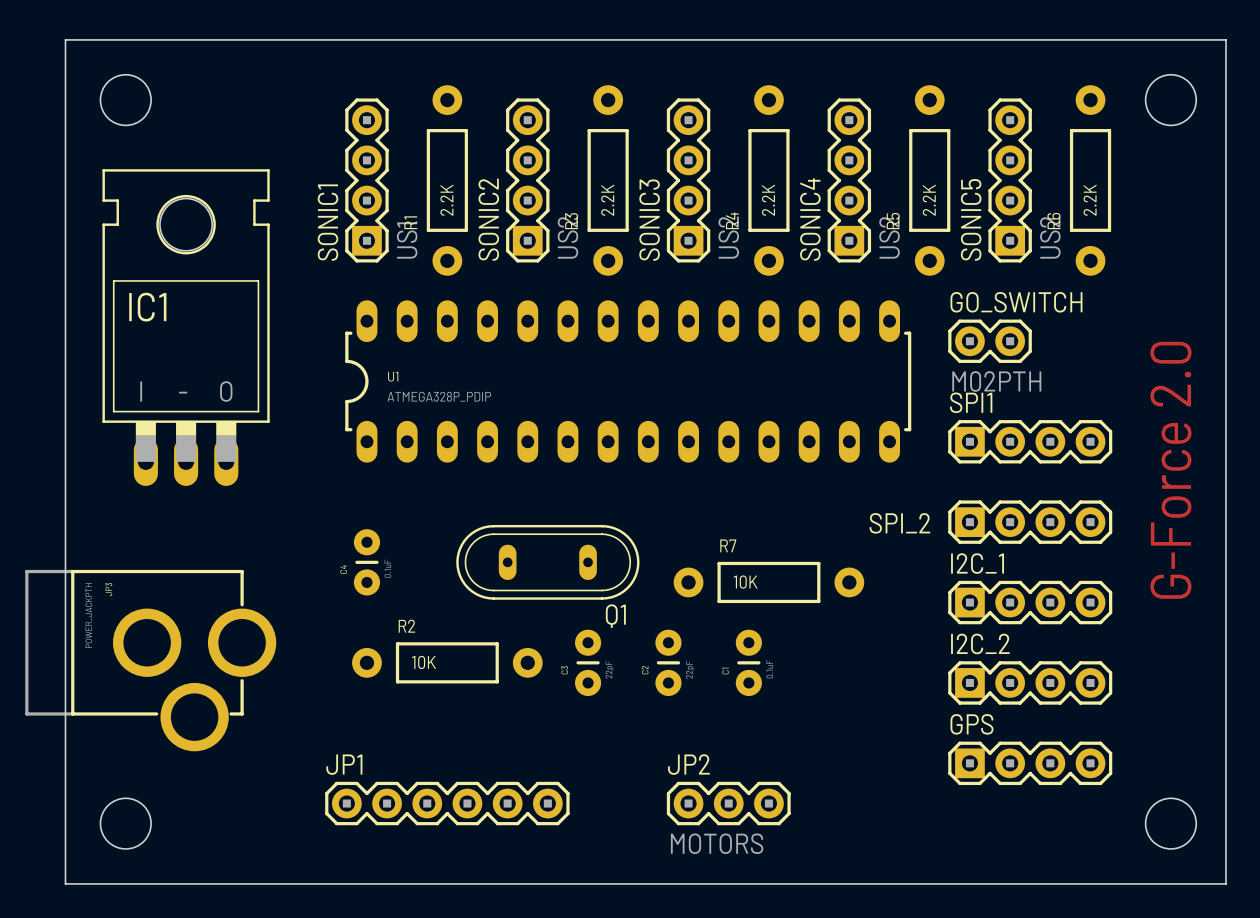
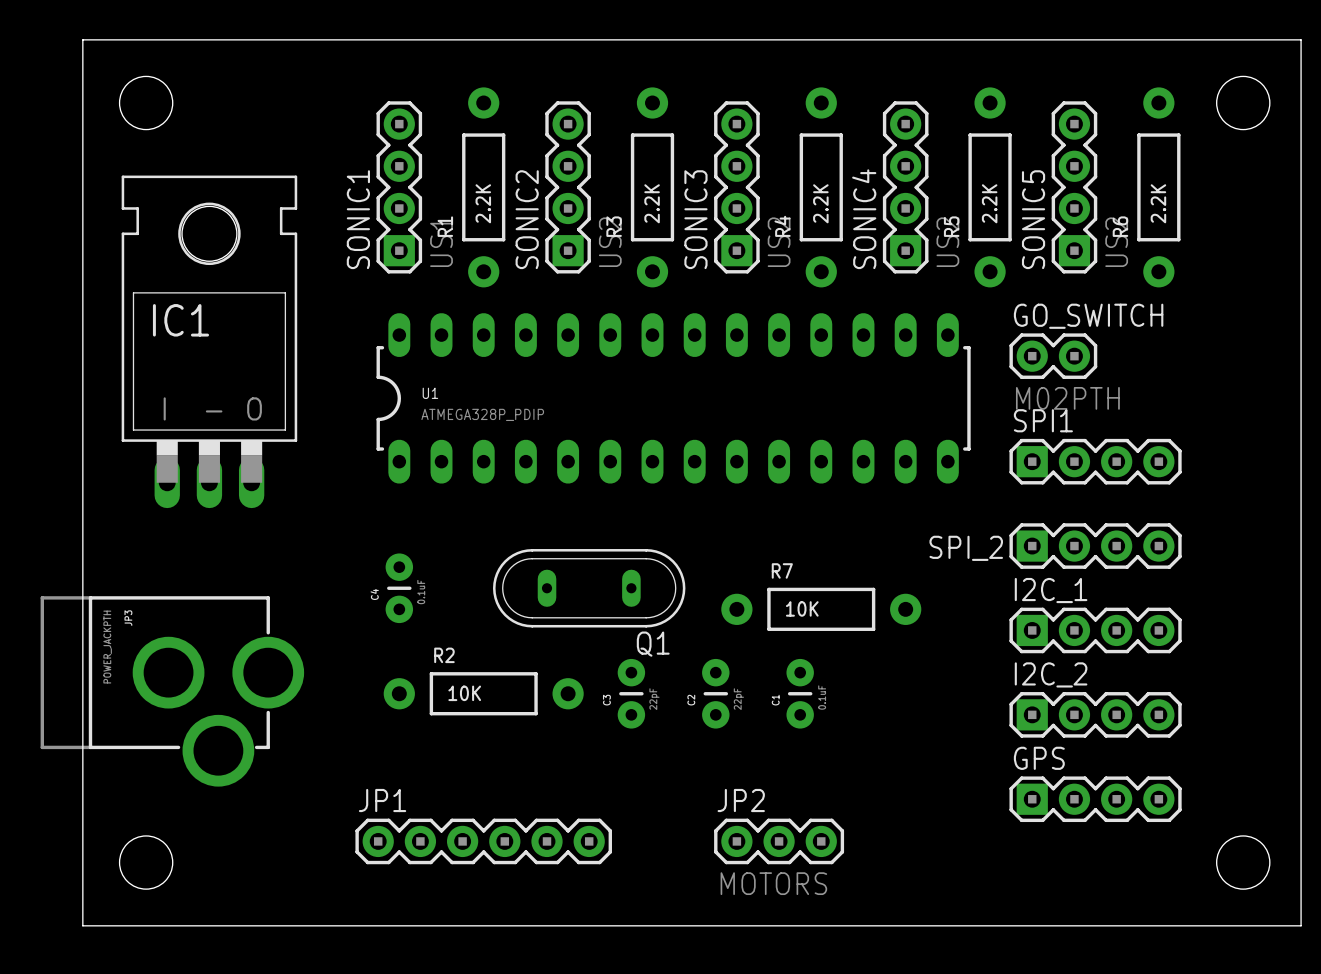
text: G-Force 2.0 (1170, 470) -> none

